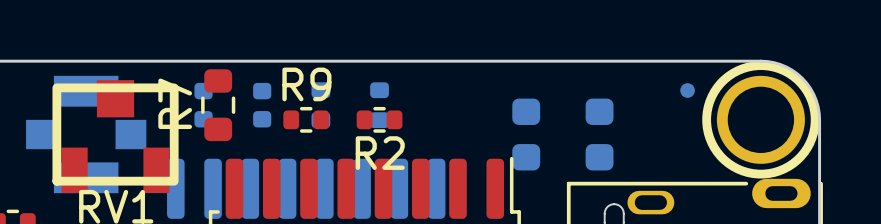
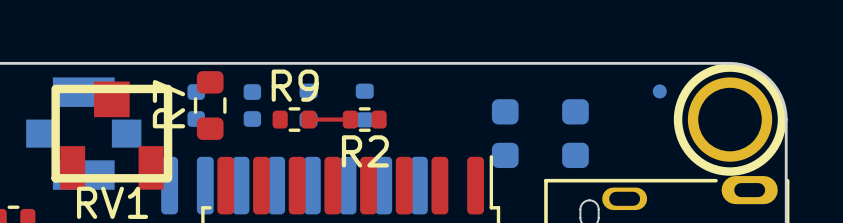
top track: none -> (308, 119) (350, 119)

